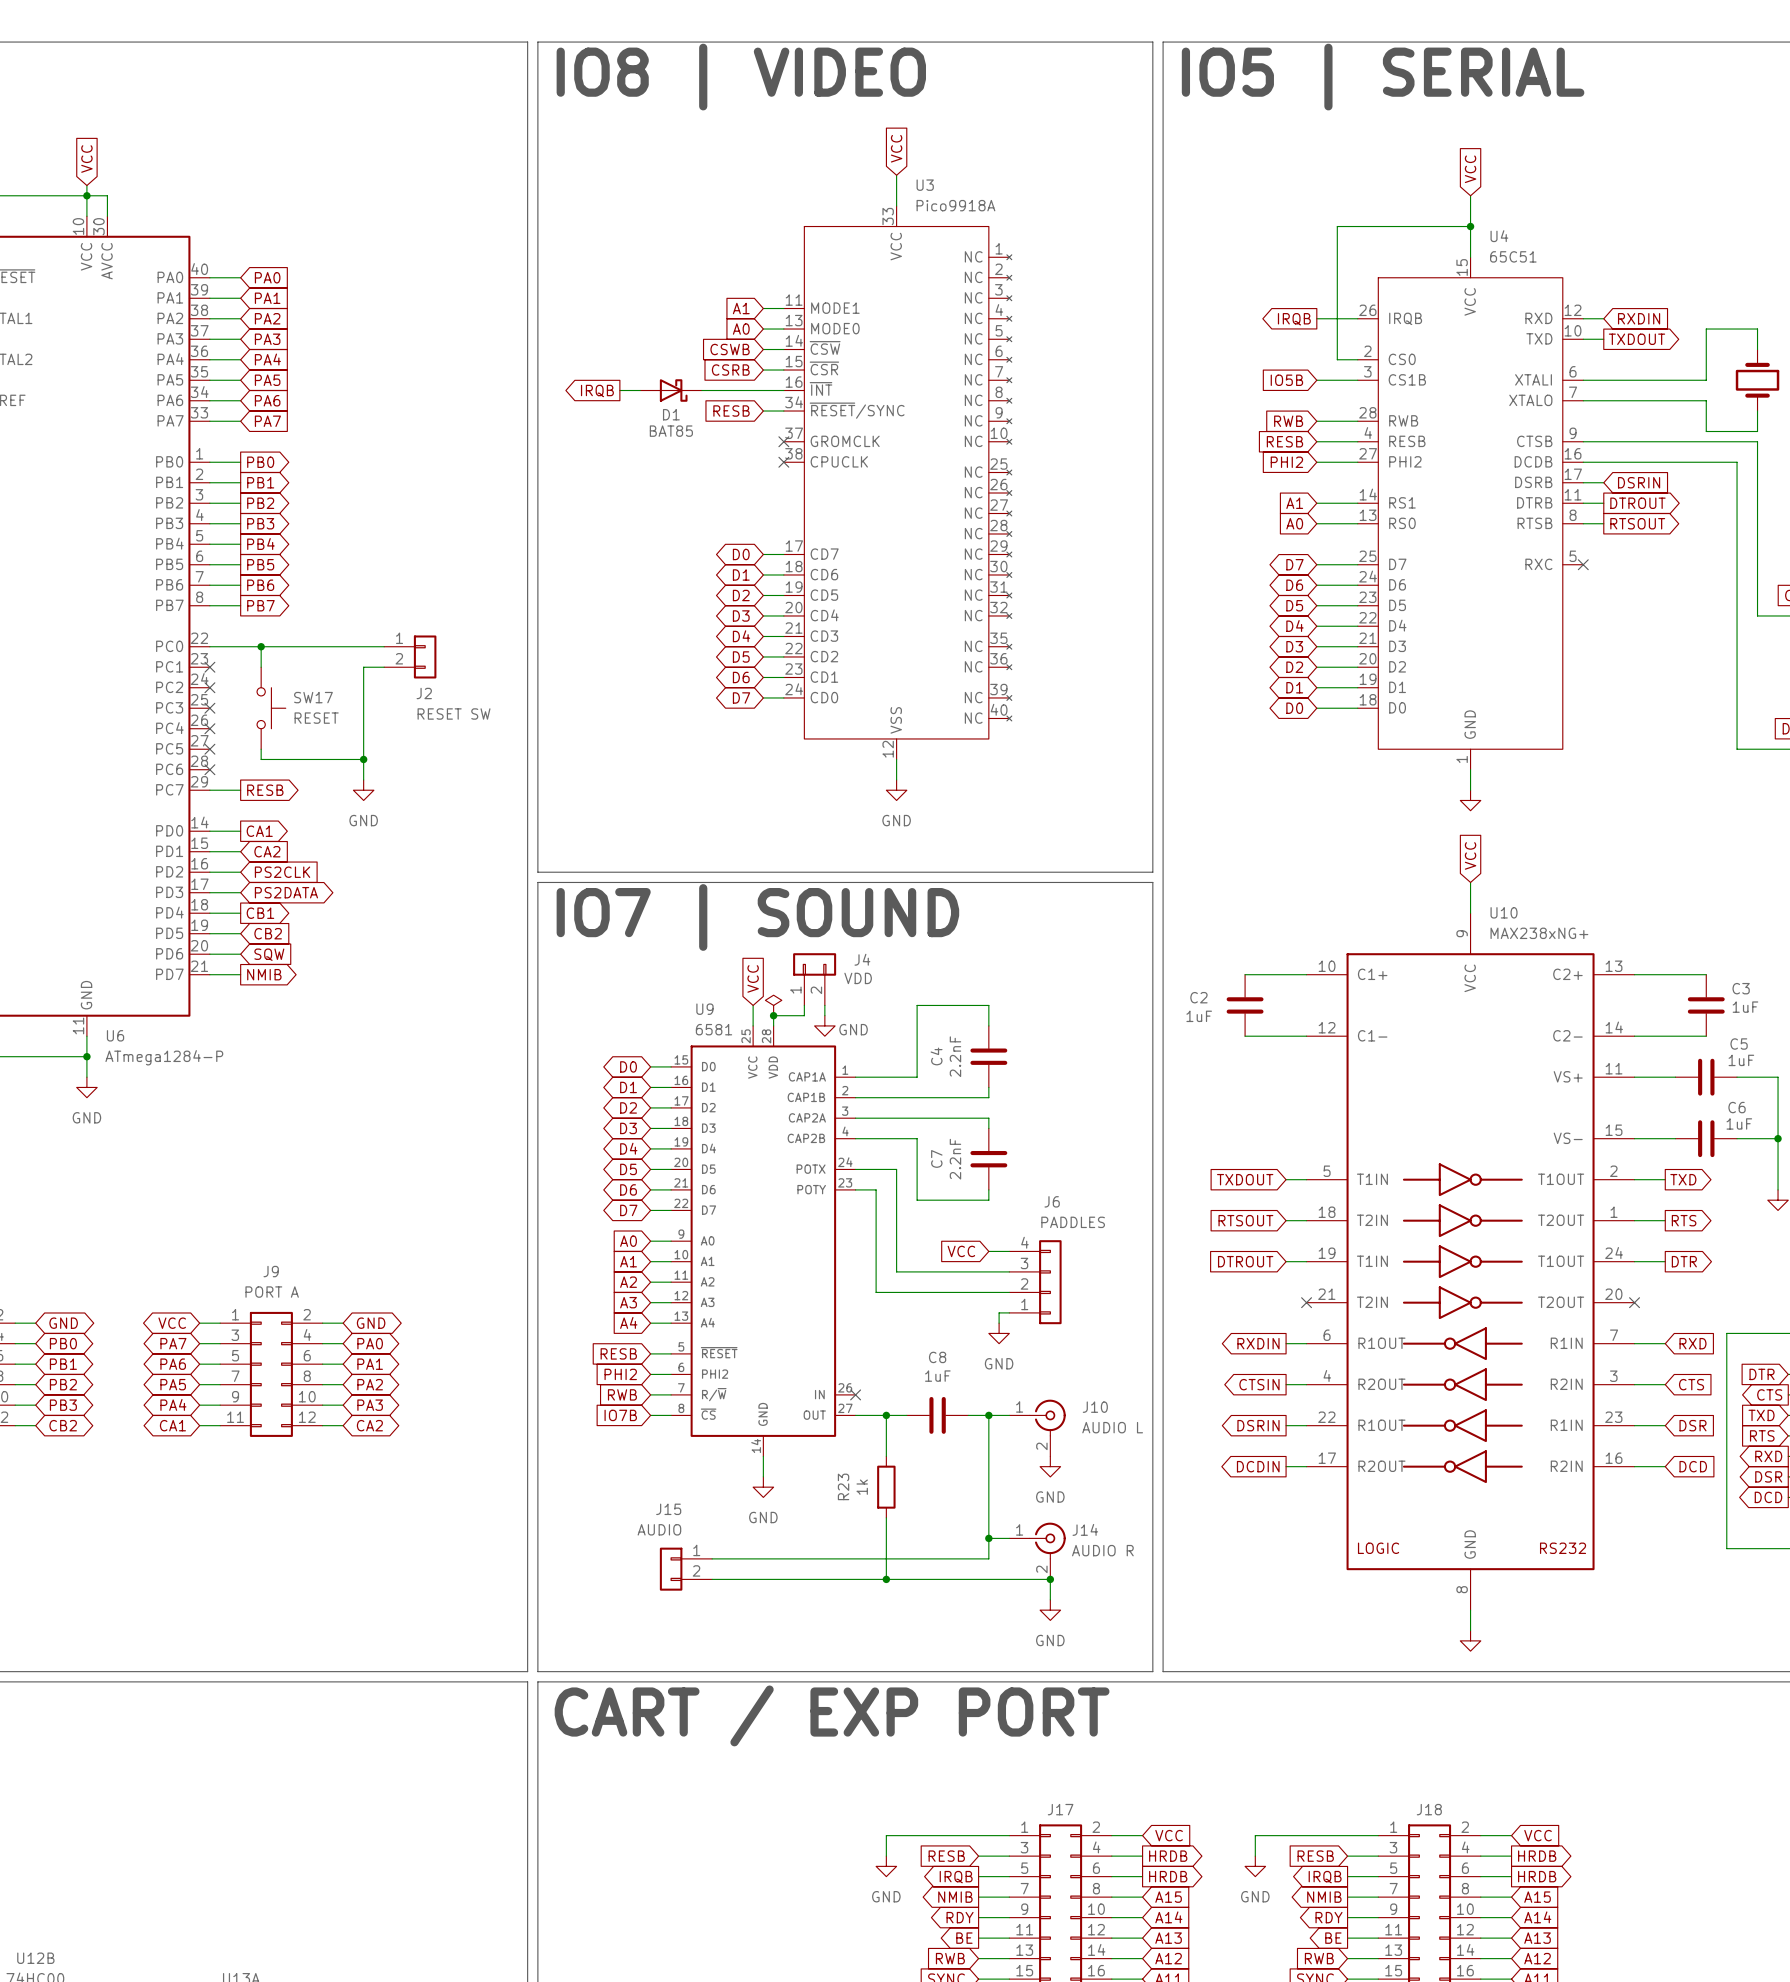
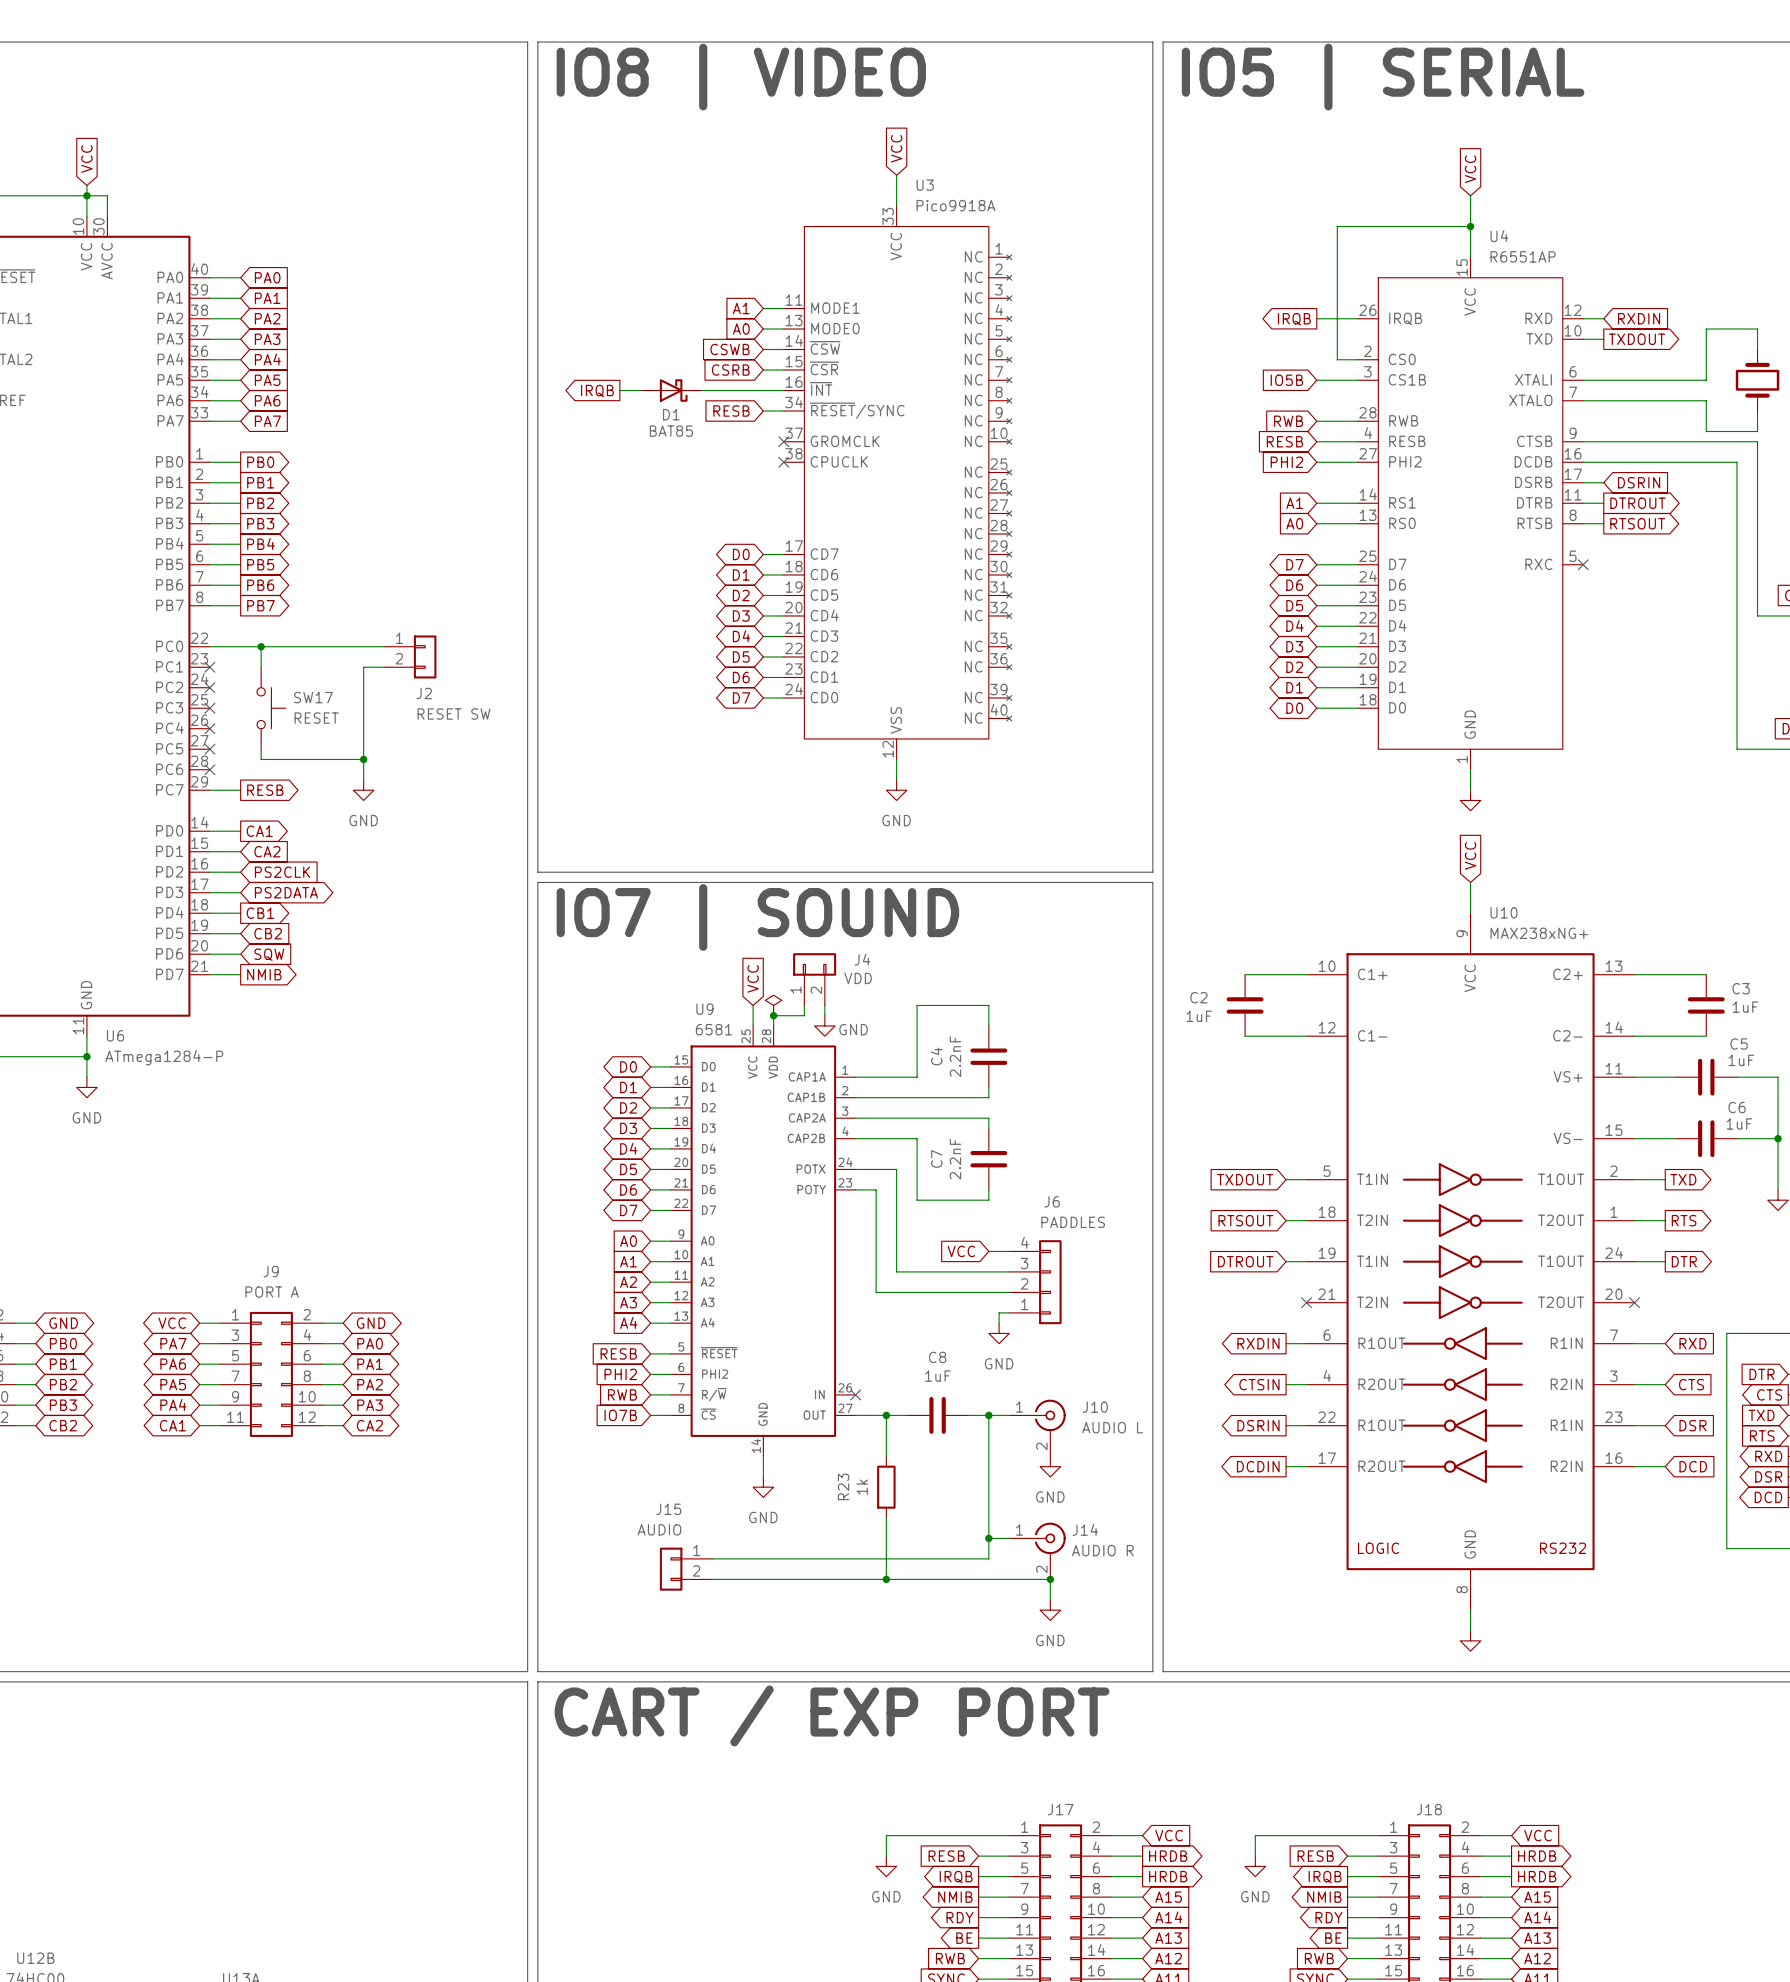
U4 value: 65C51 (1513, 256) -> R6551AP (1523, 256)

